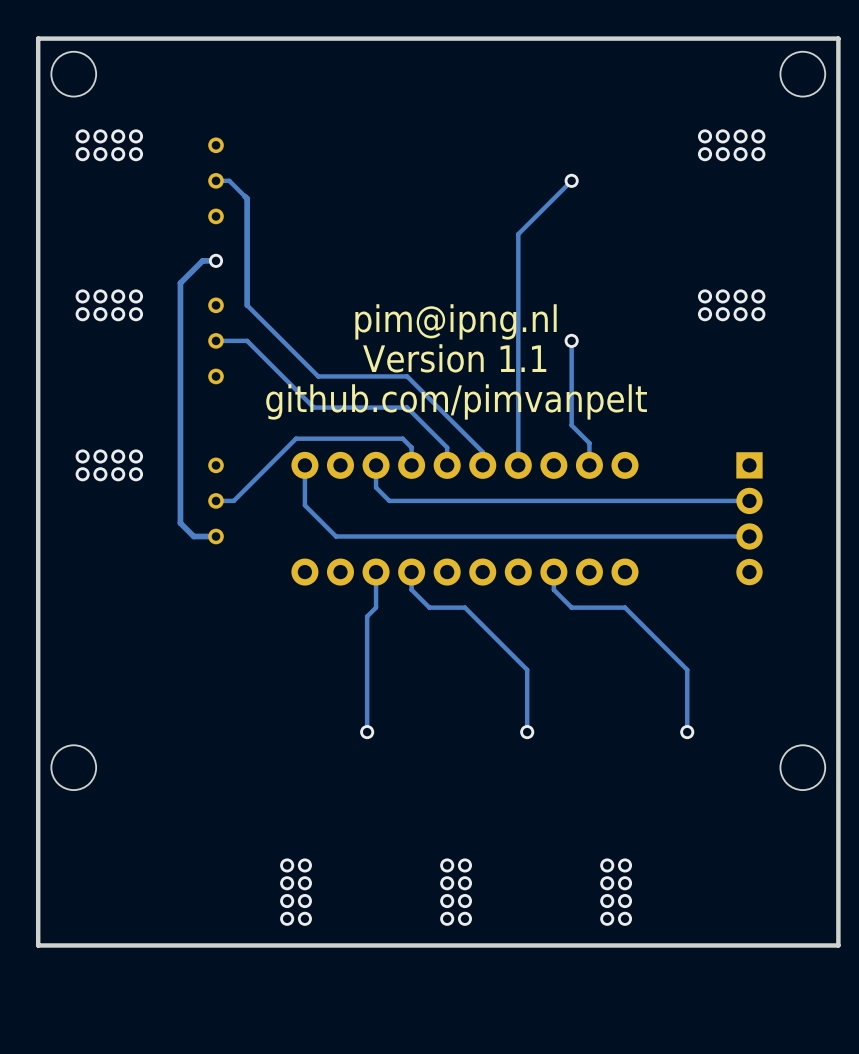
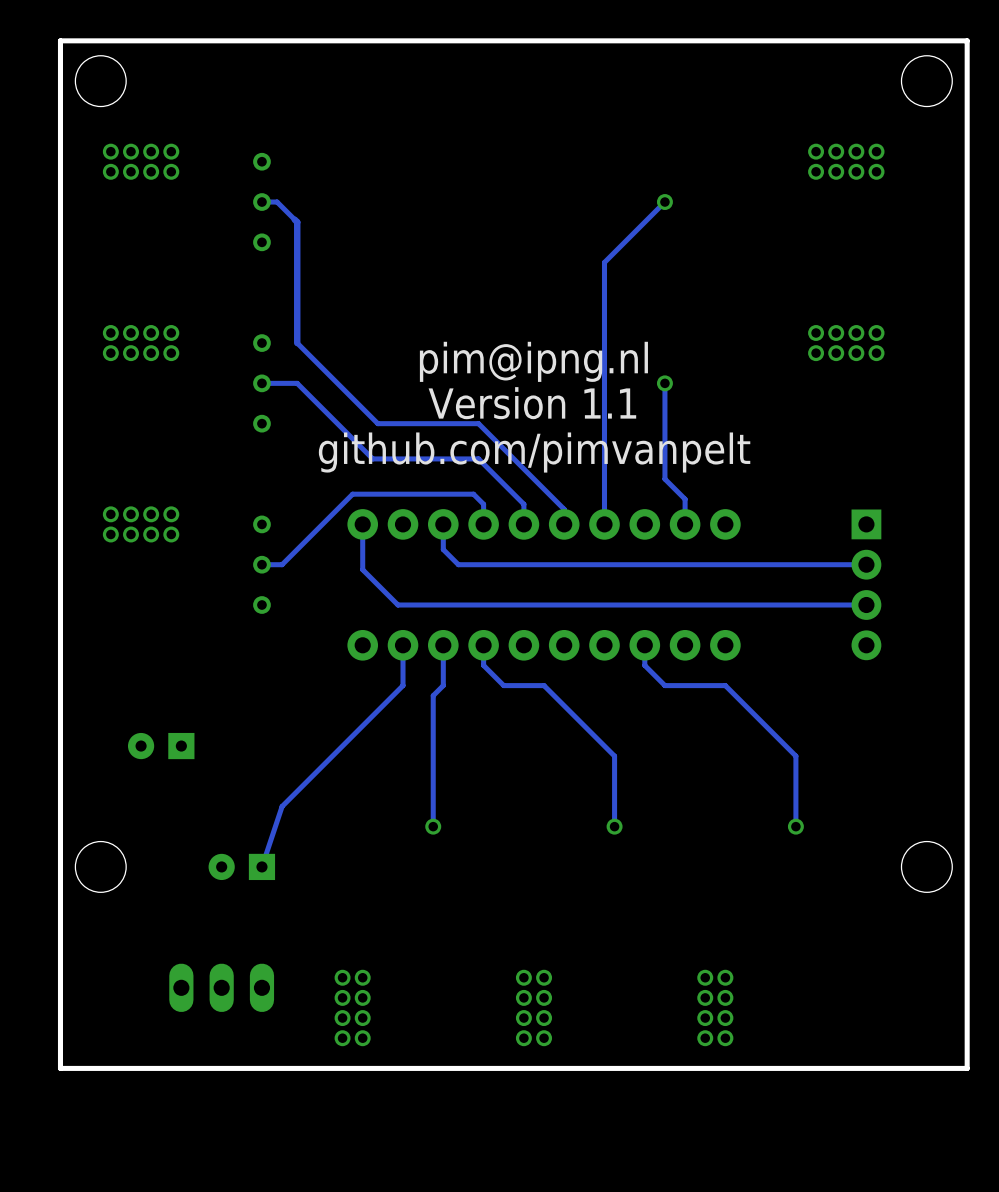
track: (216, 260) (202, 260) (180, 283) (180, 523) (193, 536) (216, 536) -> none
via: (216, 260) -> none
track: none -> (403, 645) (403, 685) (282, 806) (261, 866)
part: none -> (161, 746)
part: none -> (241, 866)
part: none -> (221, 987)

